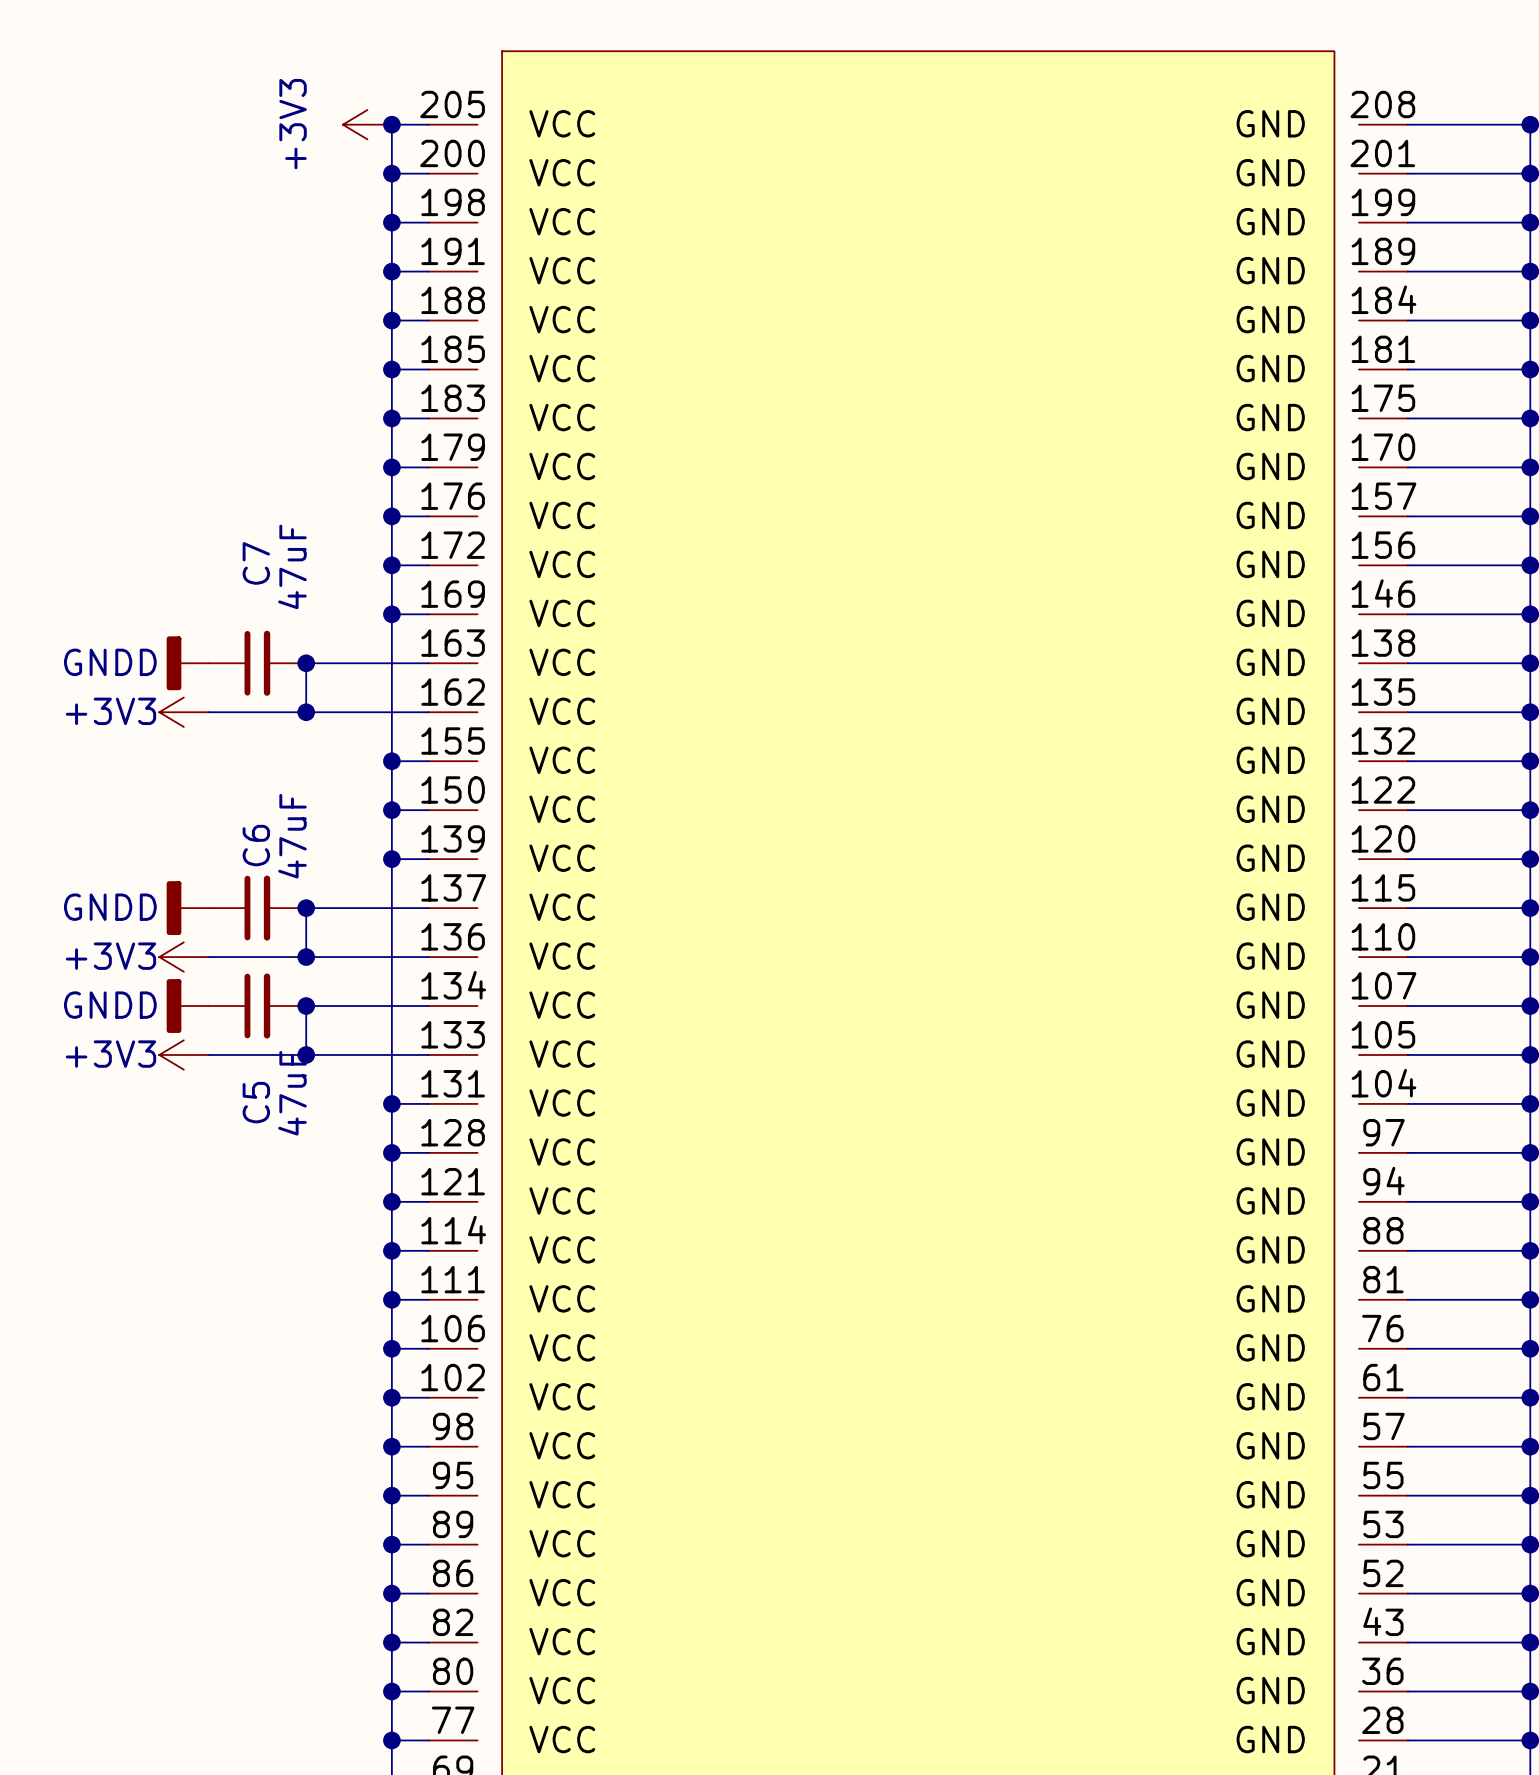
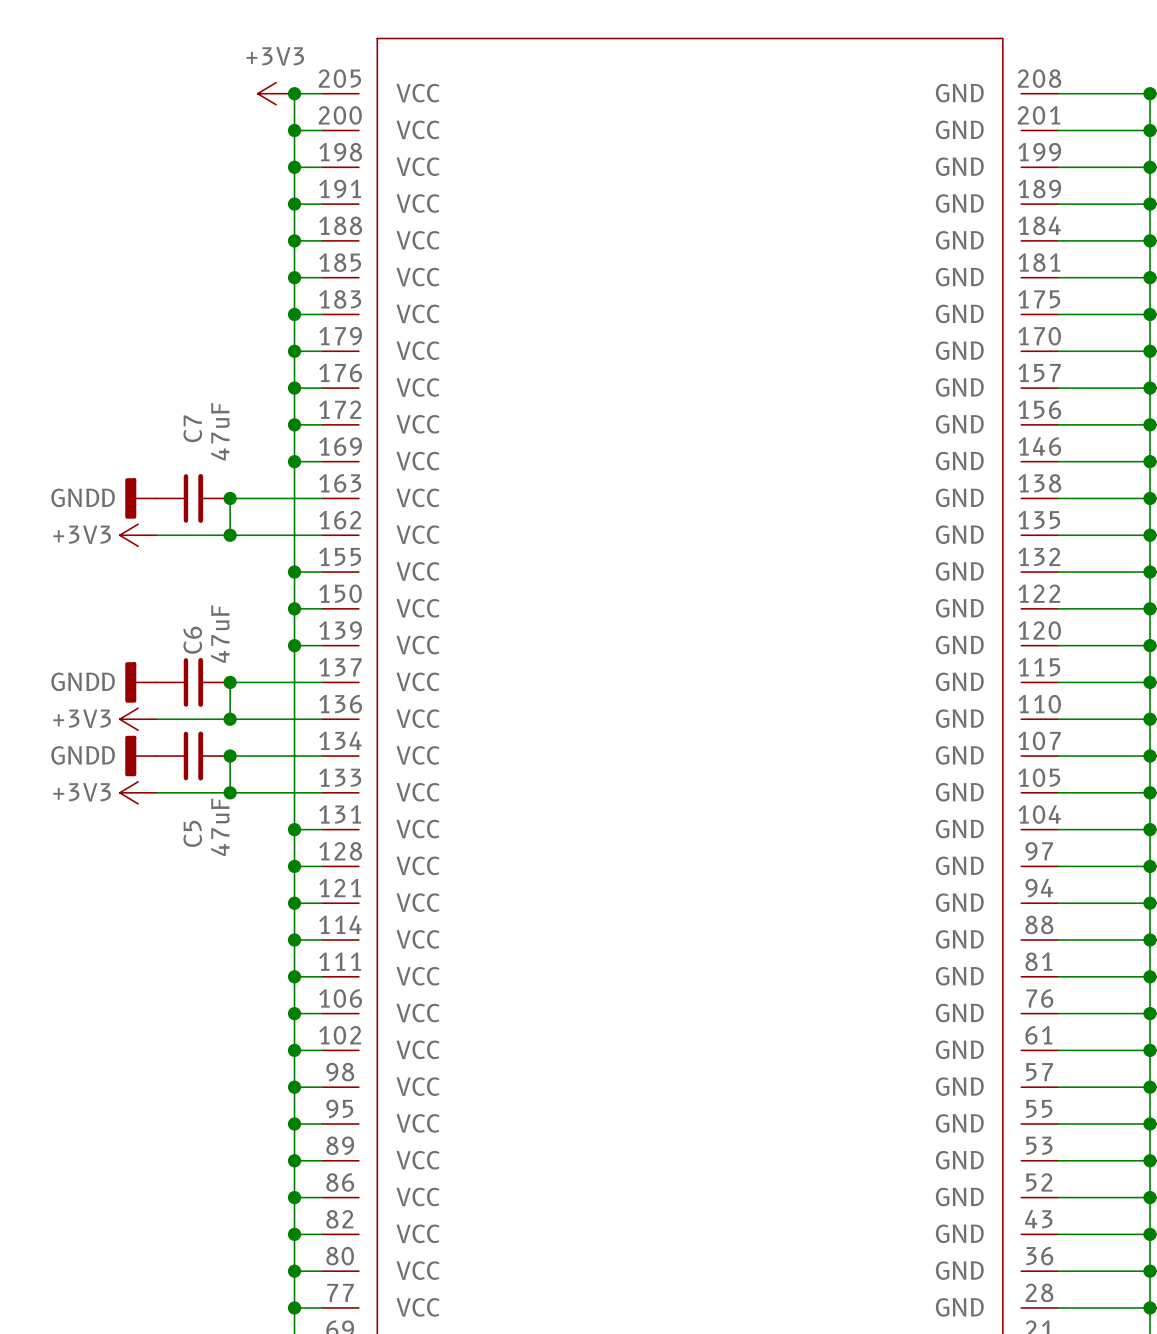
power symbol text rotation: 0° (293, 124) -> 90° clockwise (275, 56)

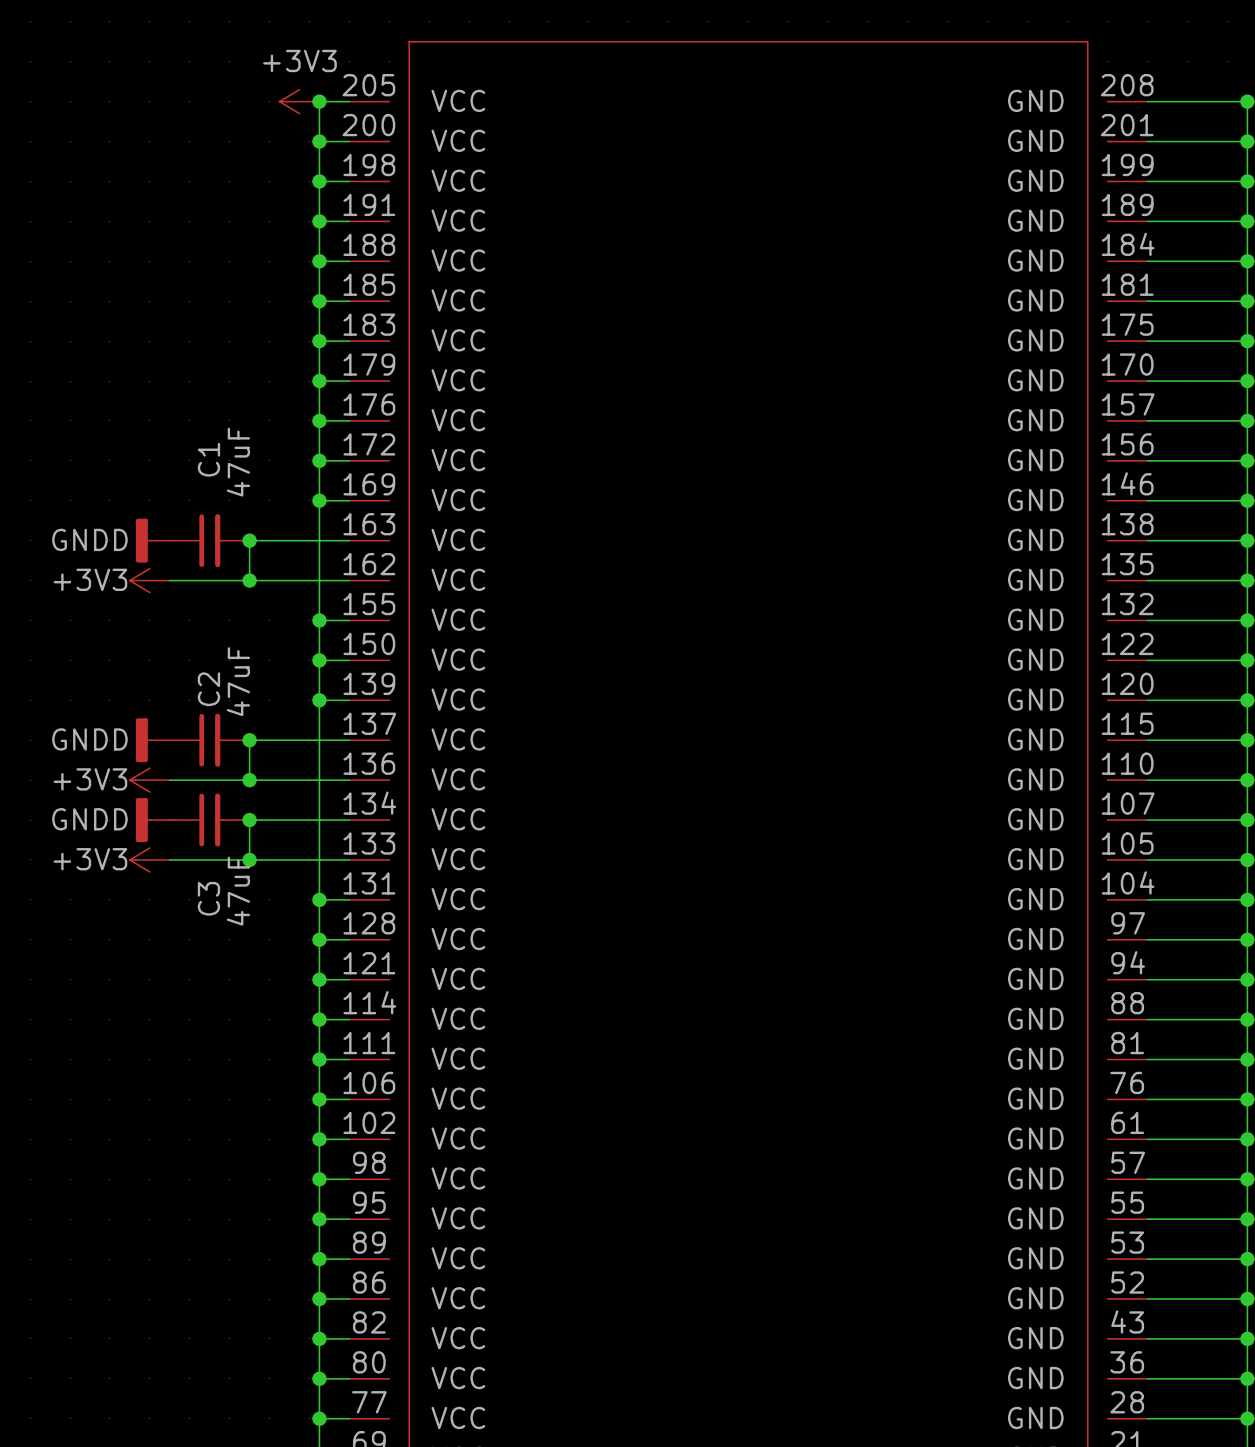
C7 name: C7 (192, 428) -> C1 (208, 459)
C6 name: C6 (192, 640) -> C2 (208, 689)
C5 name: C5 (192, 833) -> C3 (208, 898)

